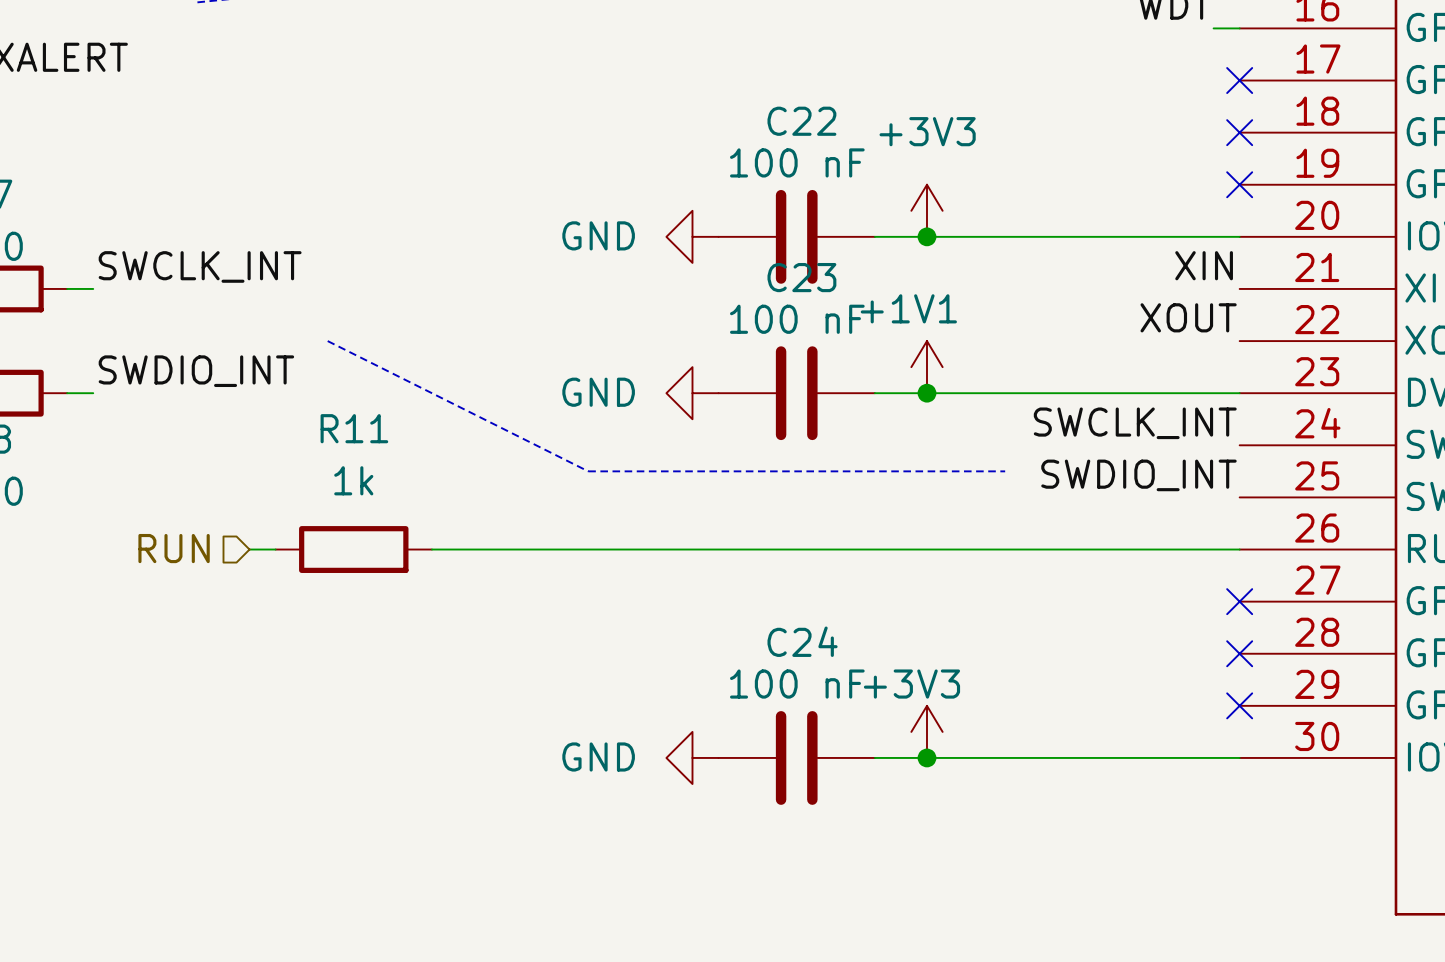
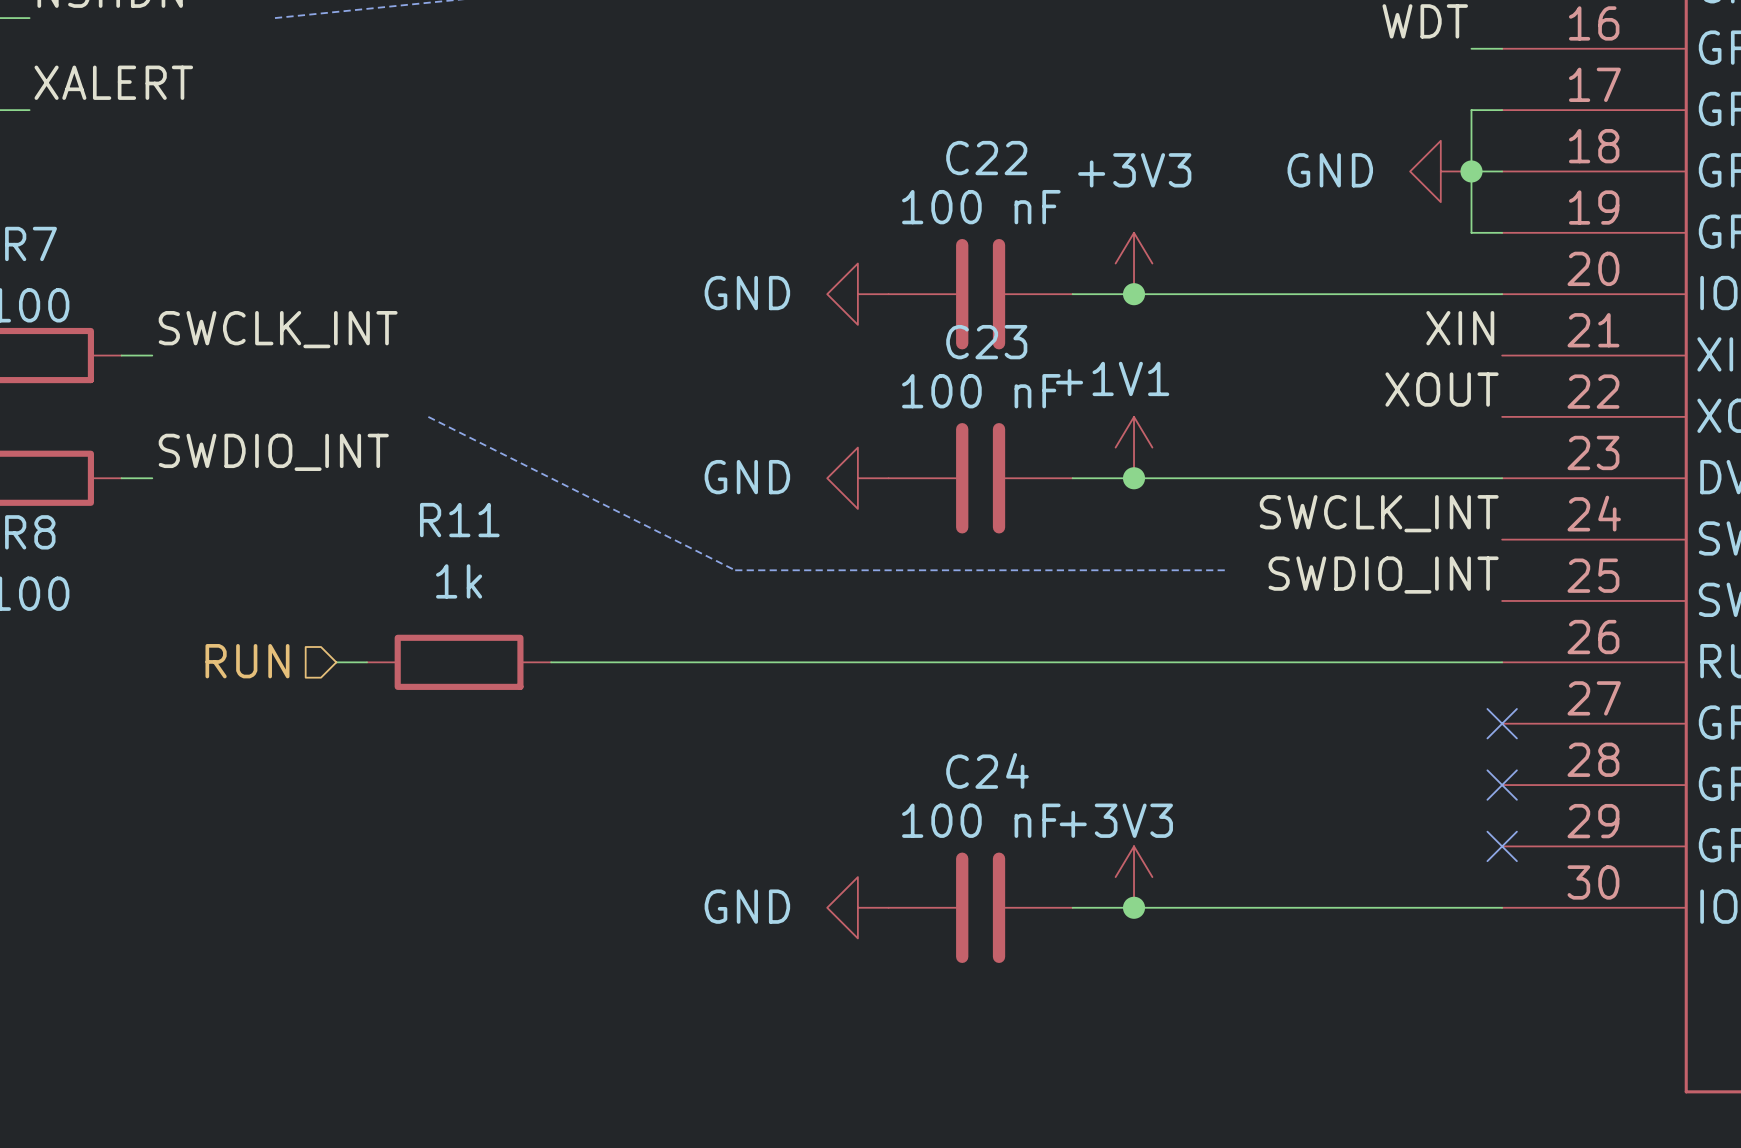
wire: none -> (1502, 110) (1471, 110) (1471, 232) (1502, 232)
no-connect mark: (1239, 80) -> none
power symbol: none -> GND (1440, 171)
wire: none -> (1471, 171) (1502, 171)
junction: none -> (1471, 171)
no-connect mark: (1239, 132) -> none
no-connect mark: (1239, 184) -> none

